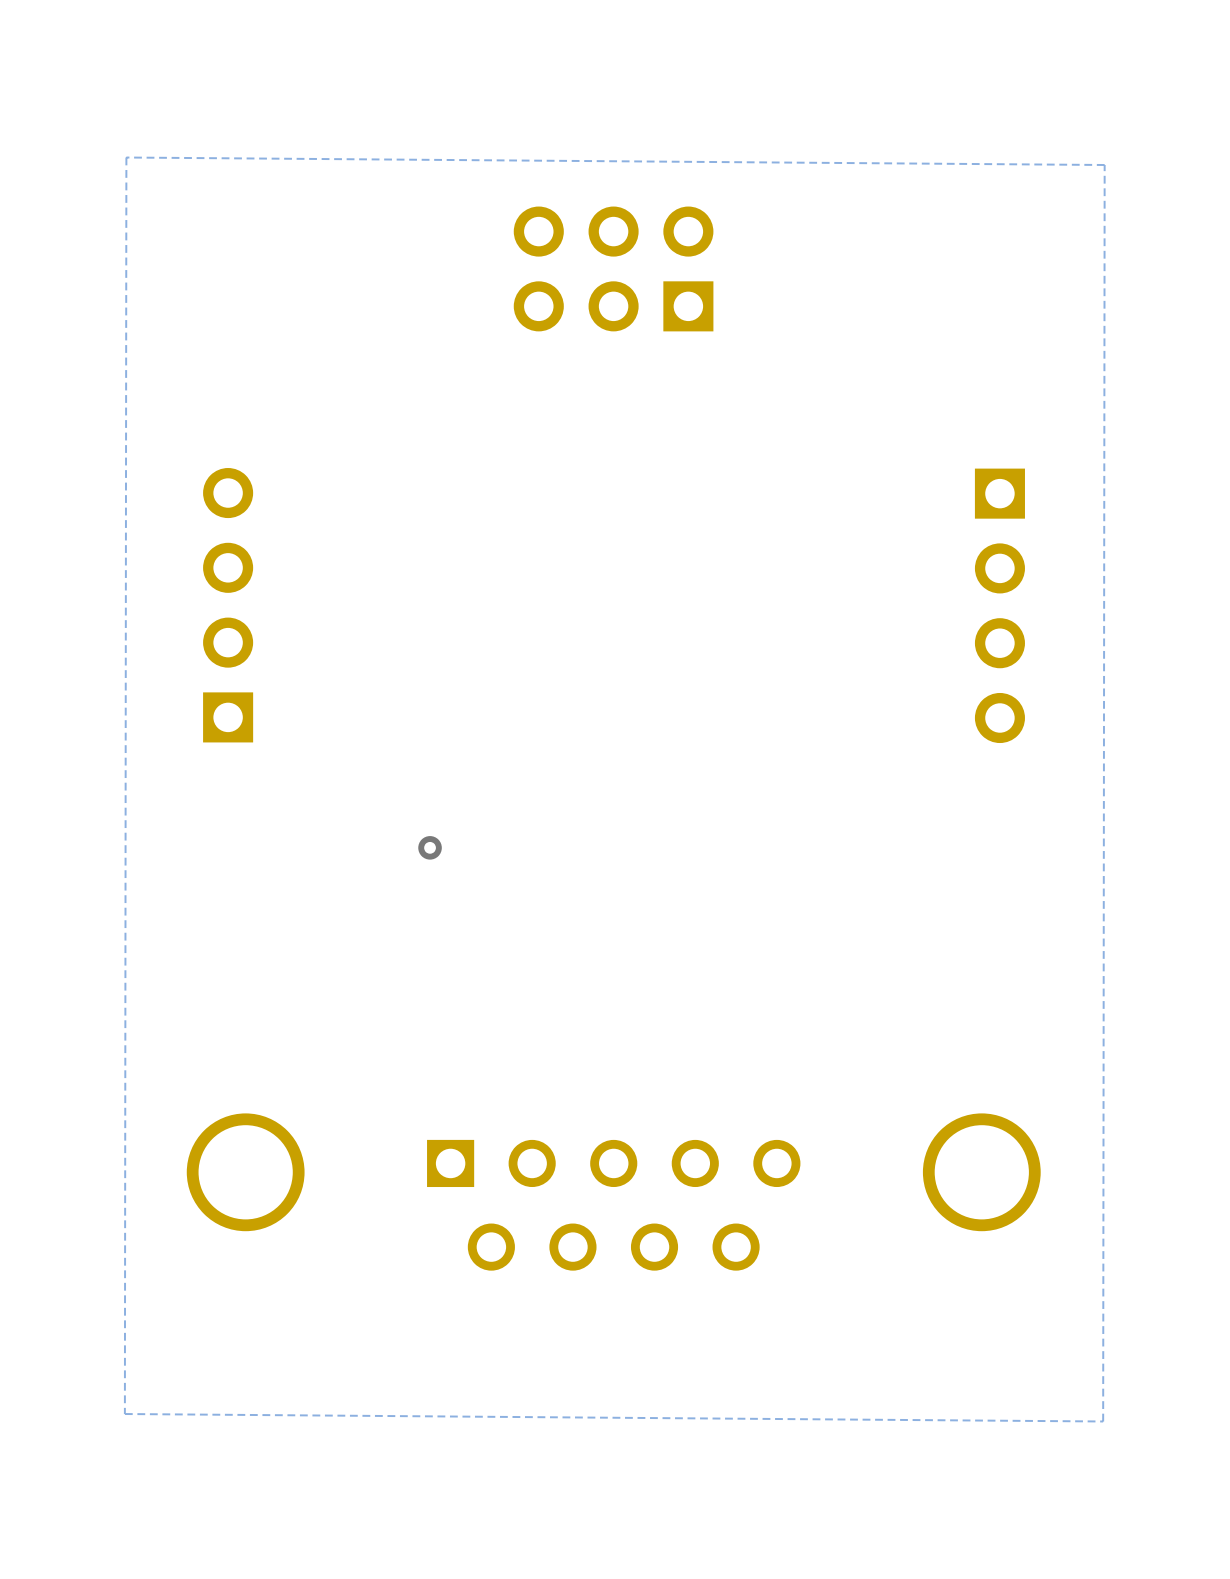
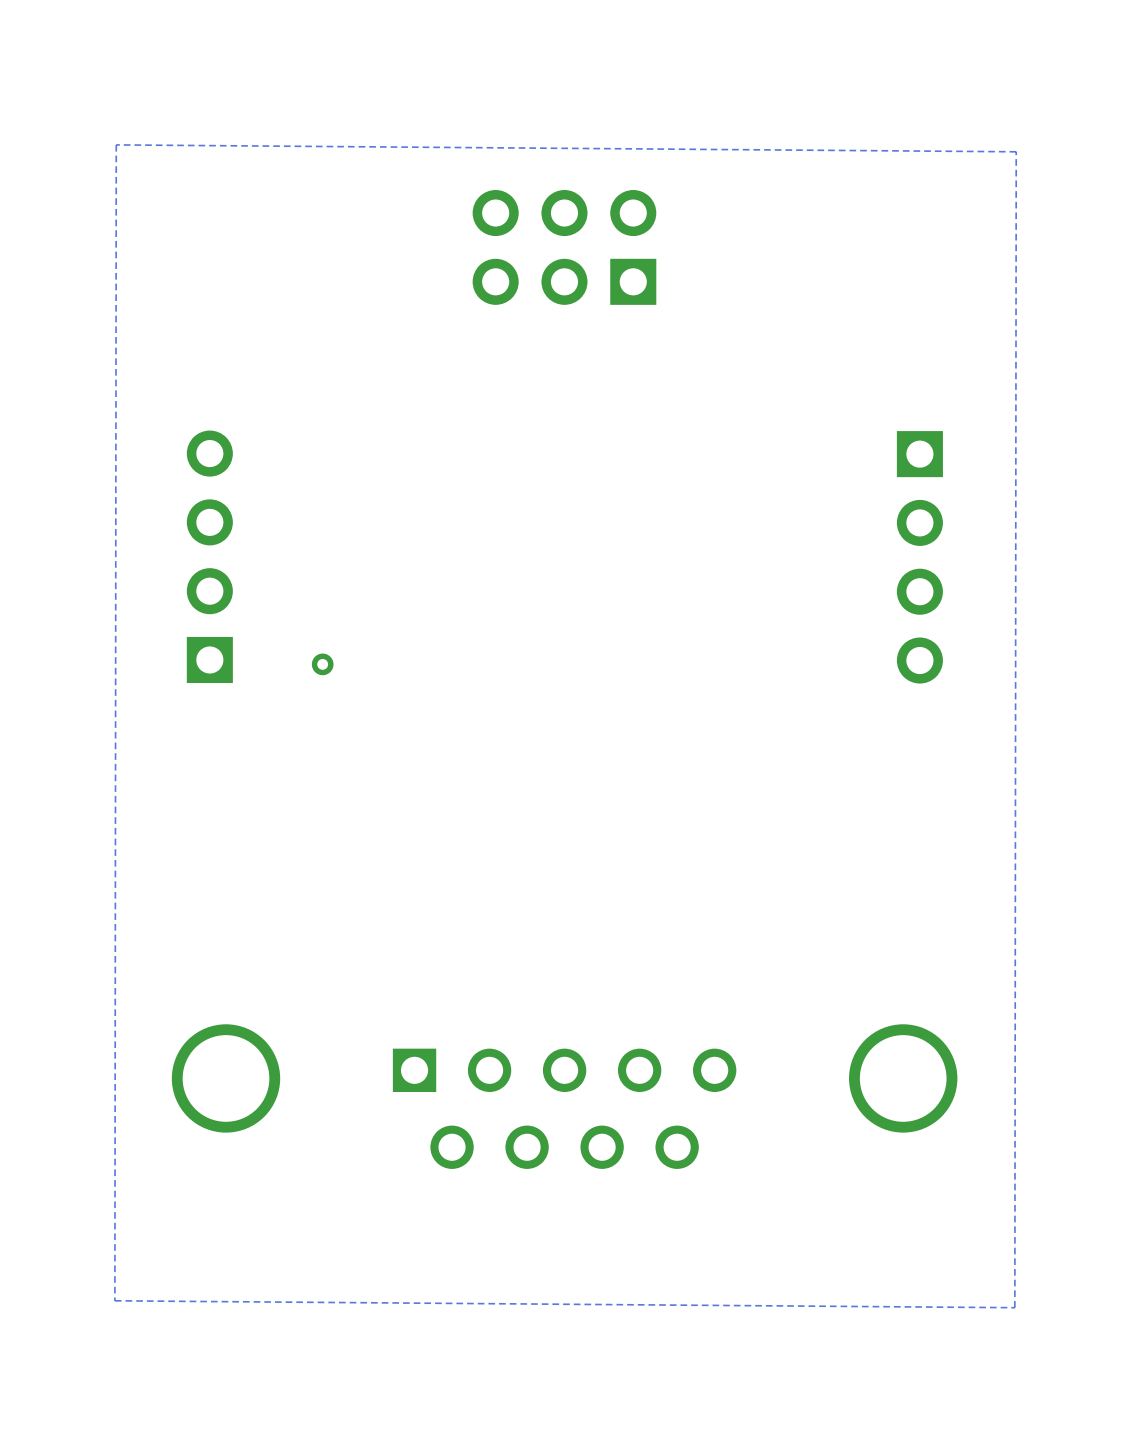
via position: (430, 847) -> (322, 664)

